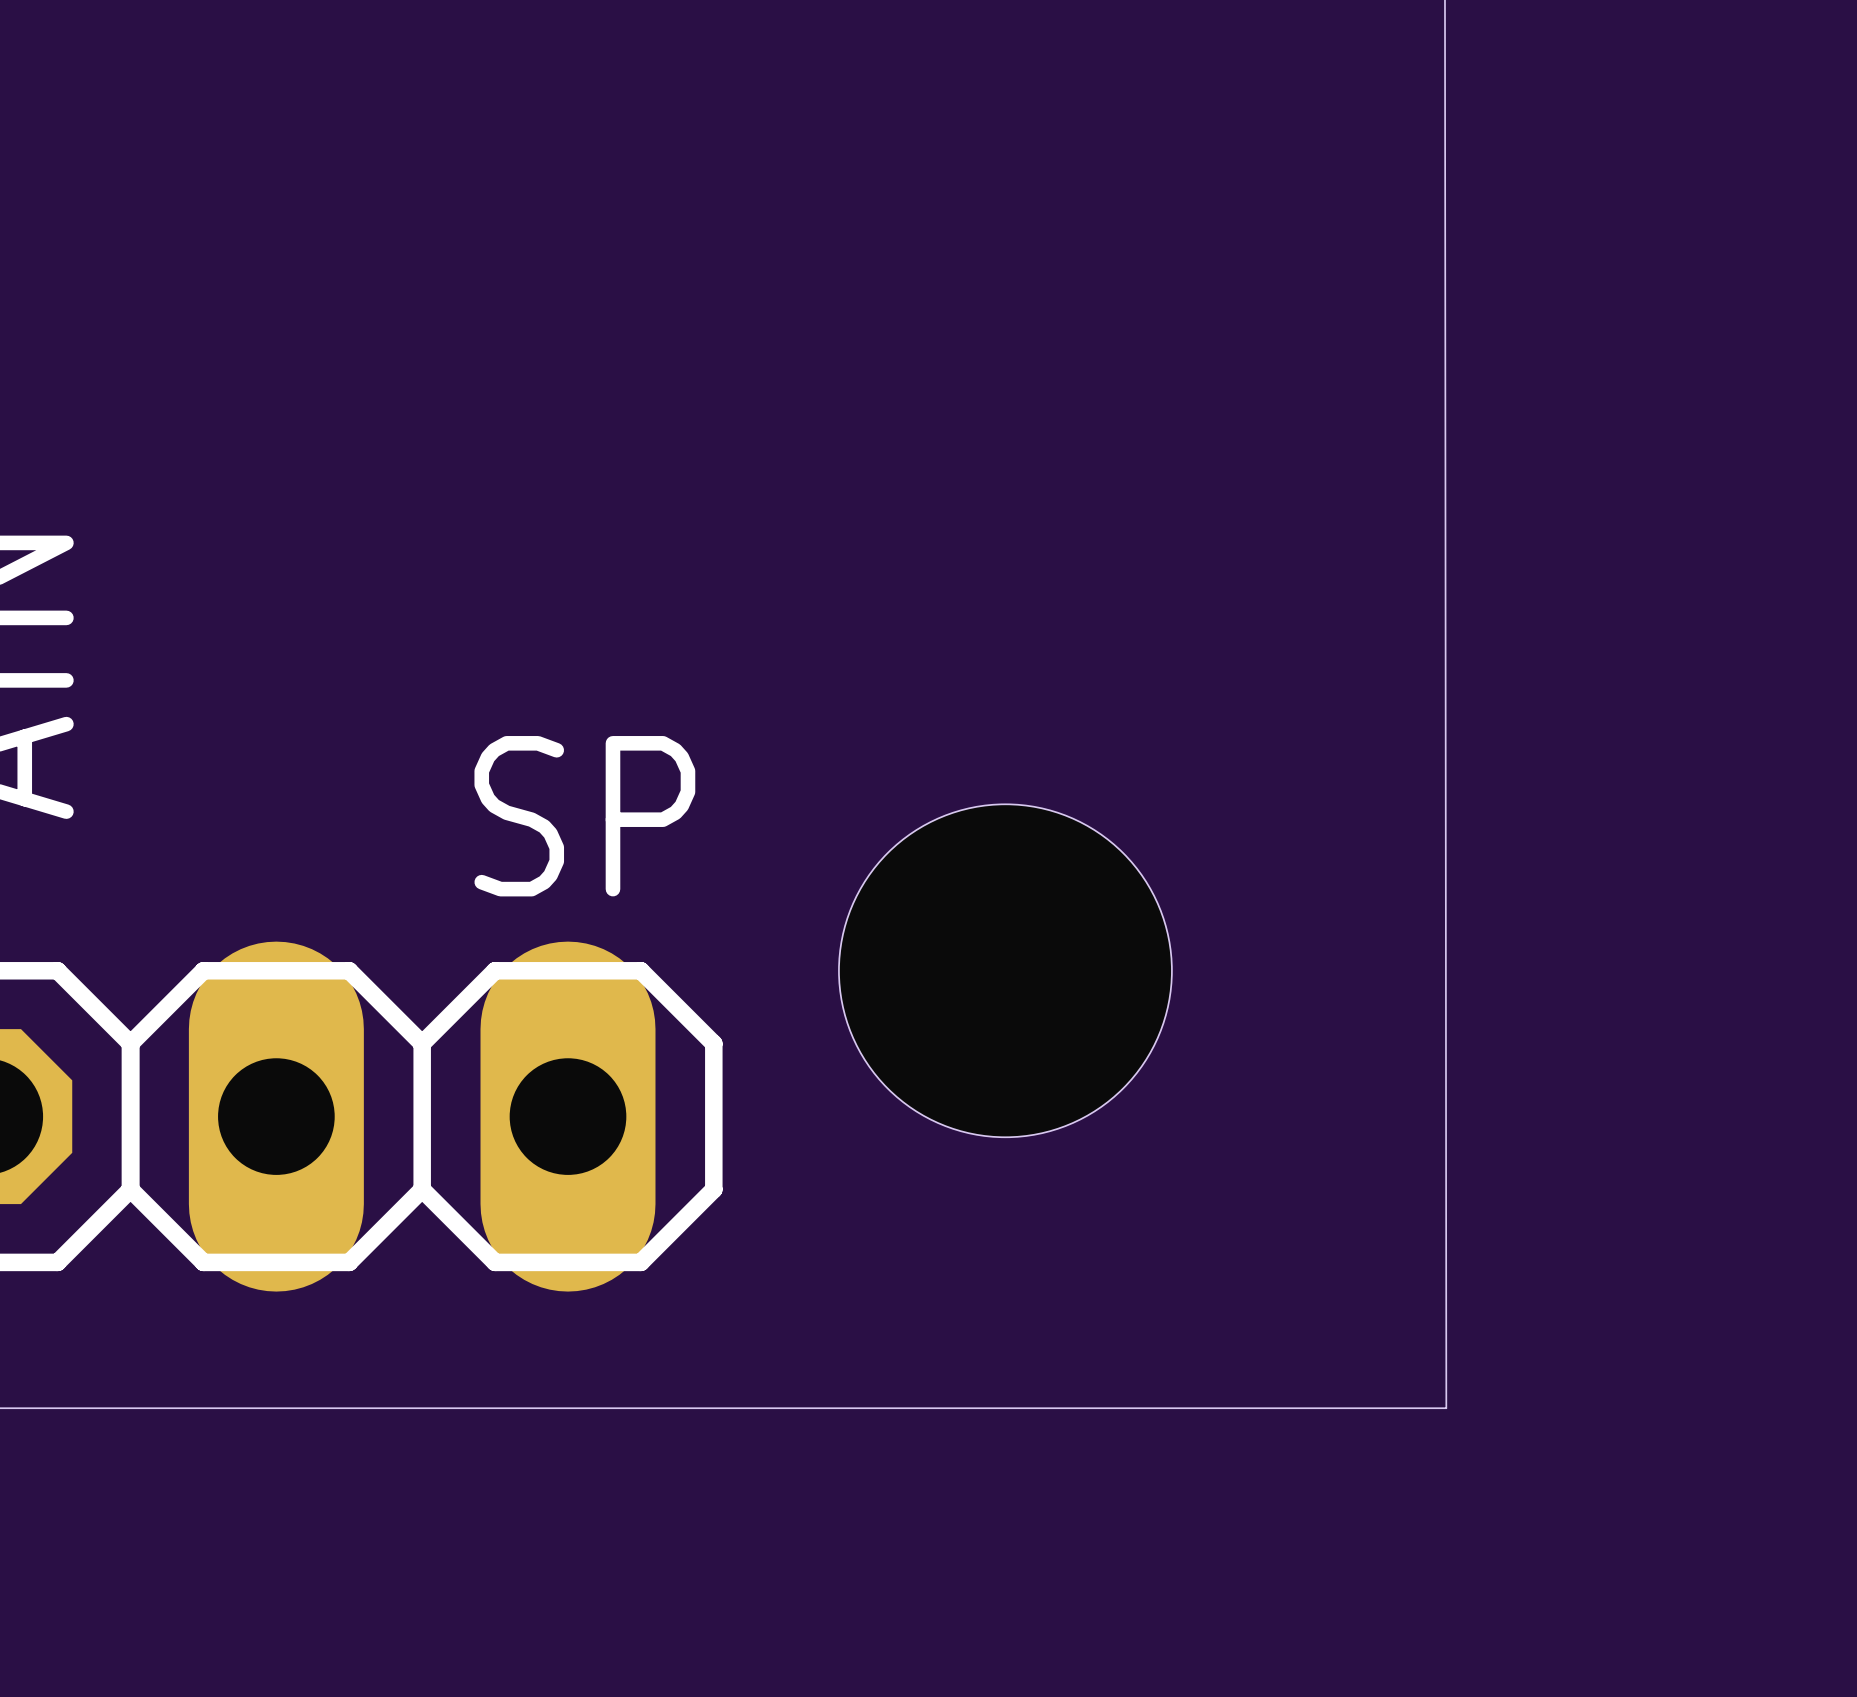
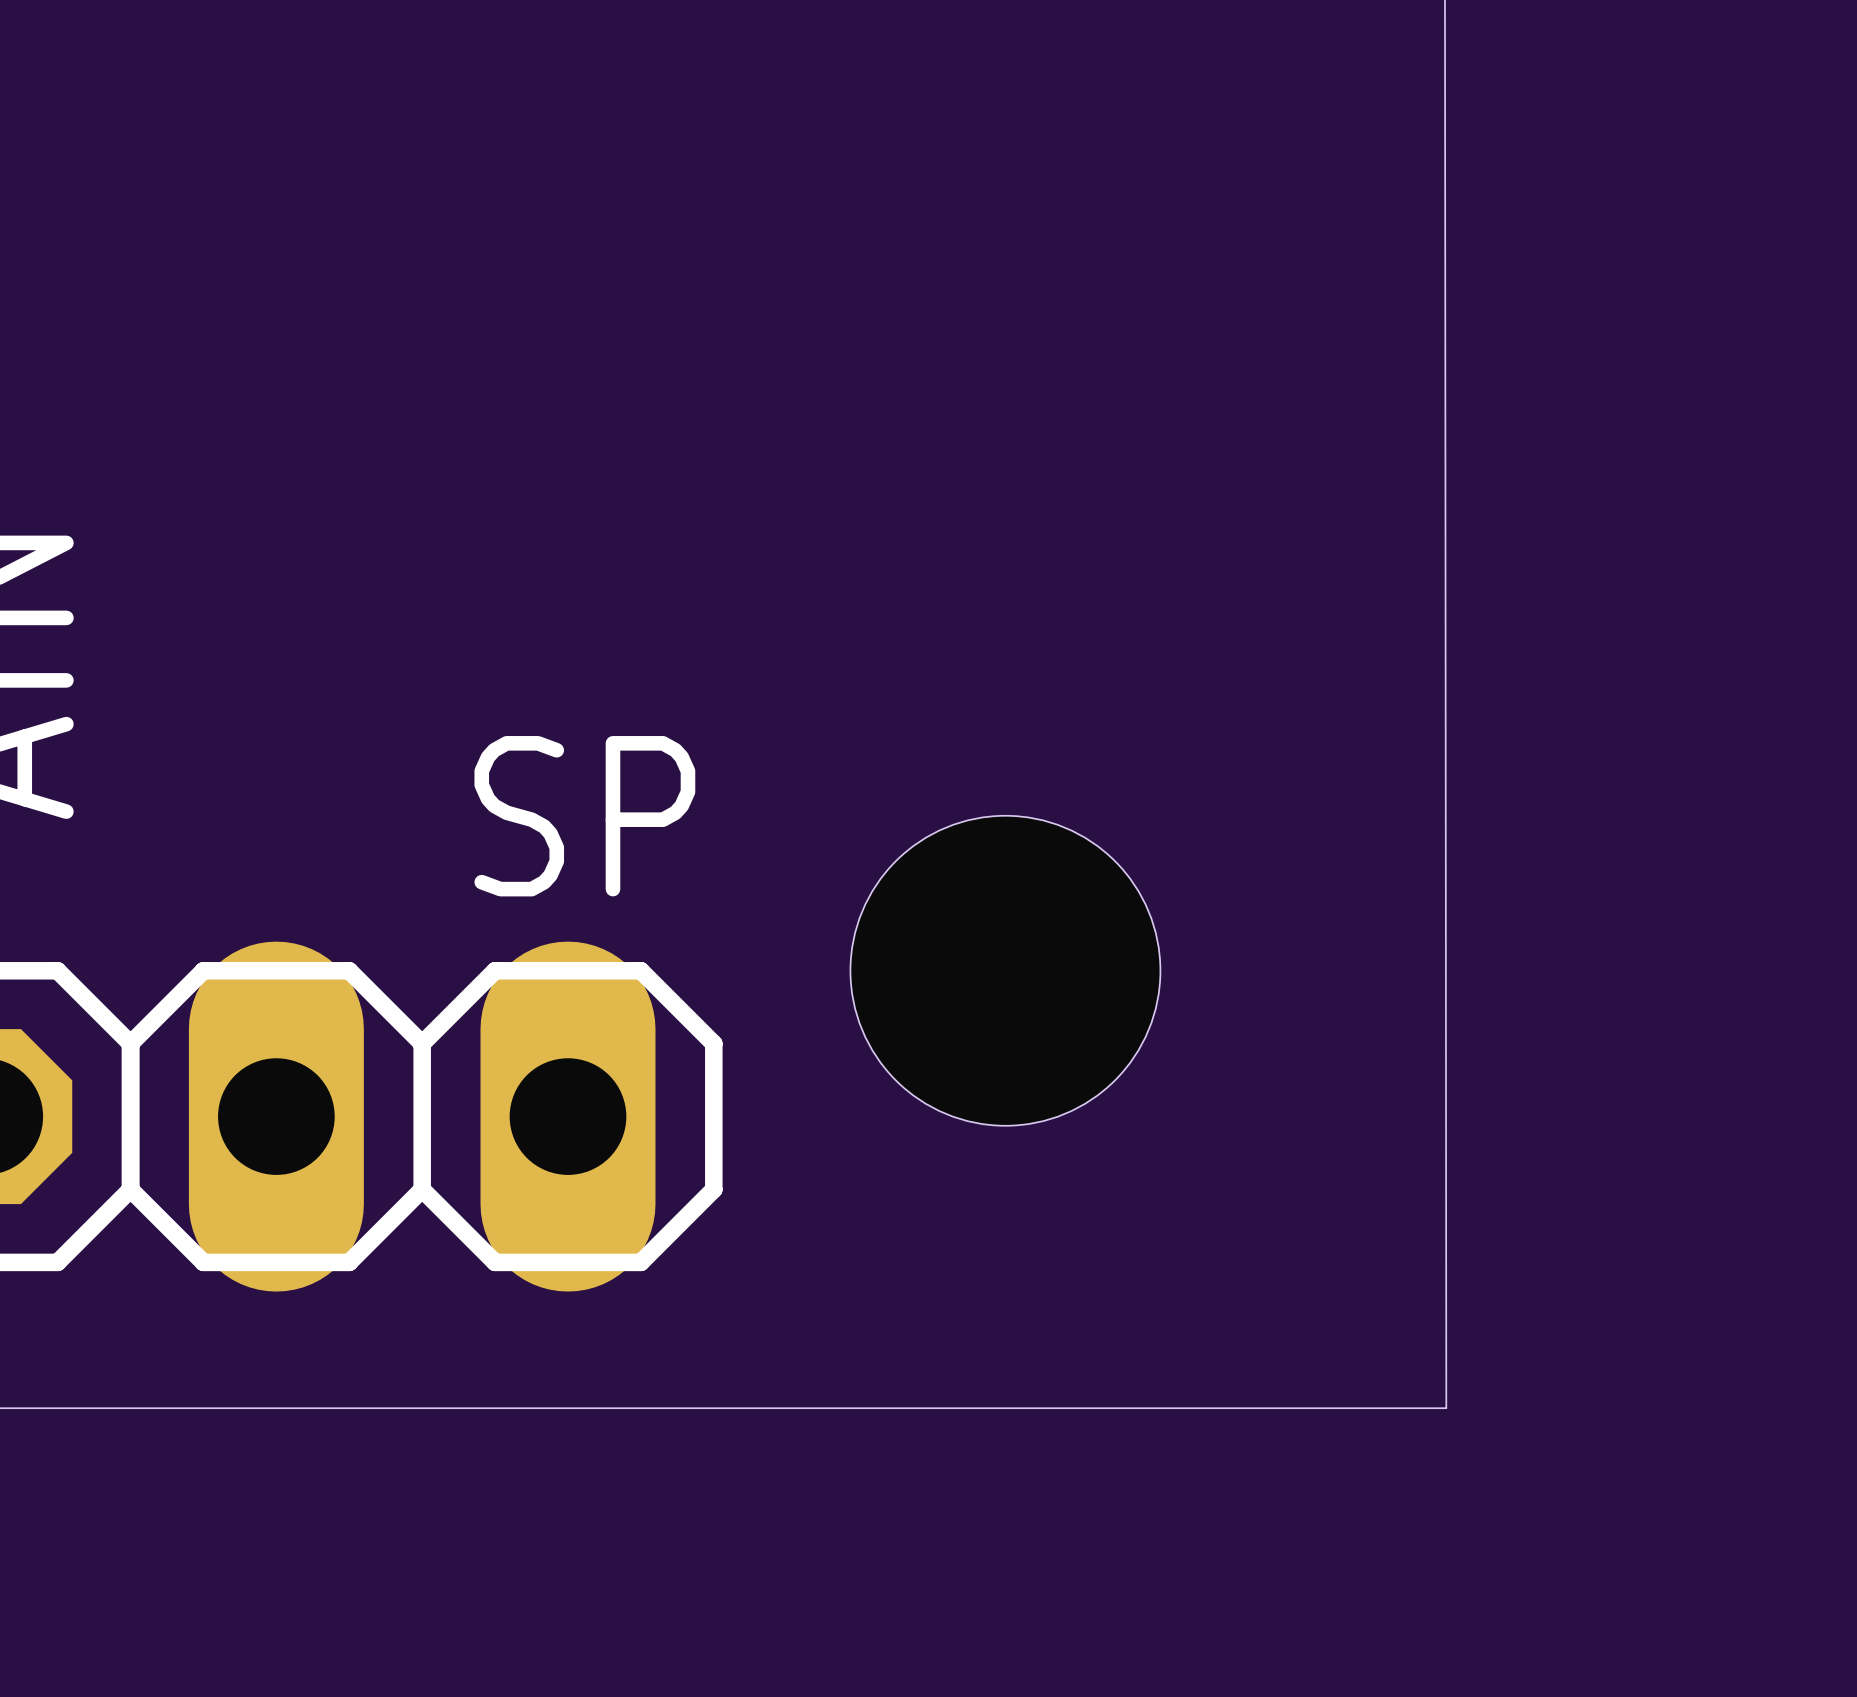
hole size: [838, 804, 1172, 1138] -> [850, 815, 1161, 1126]

